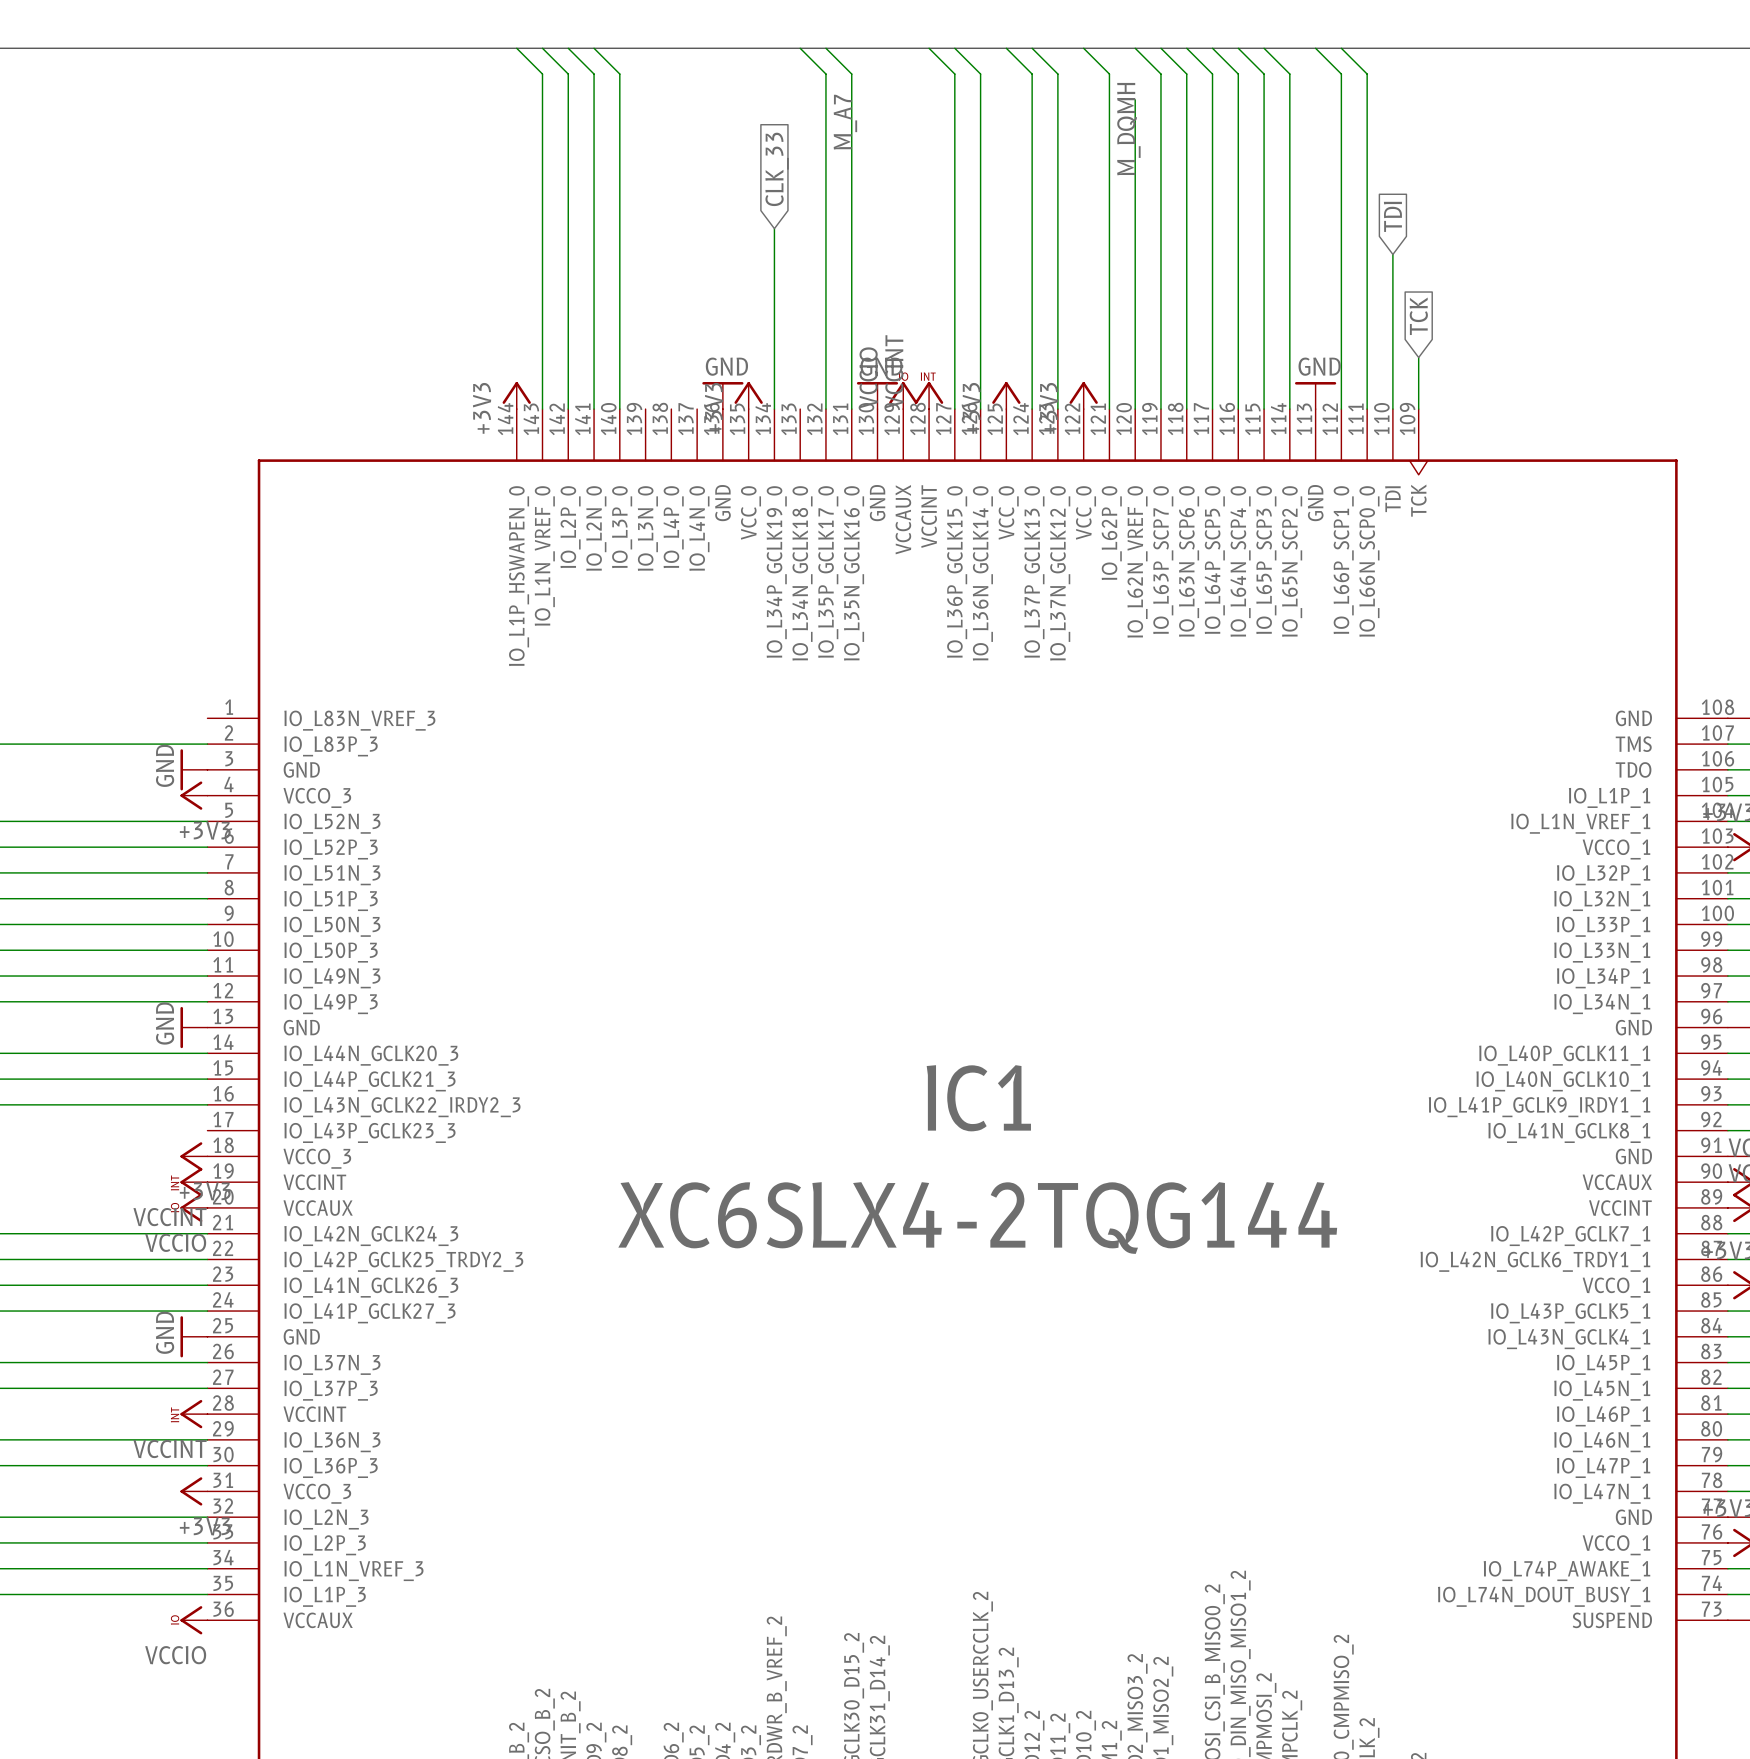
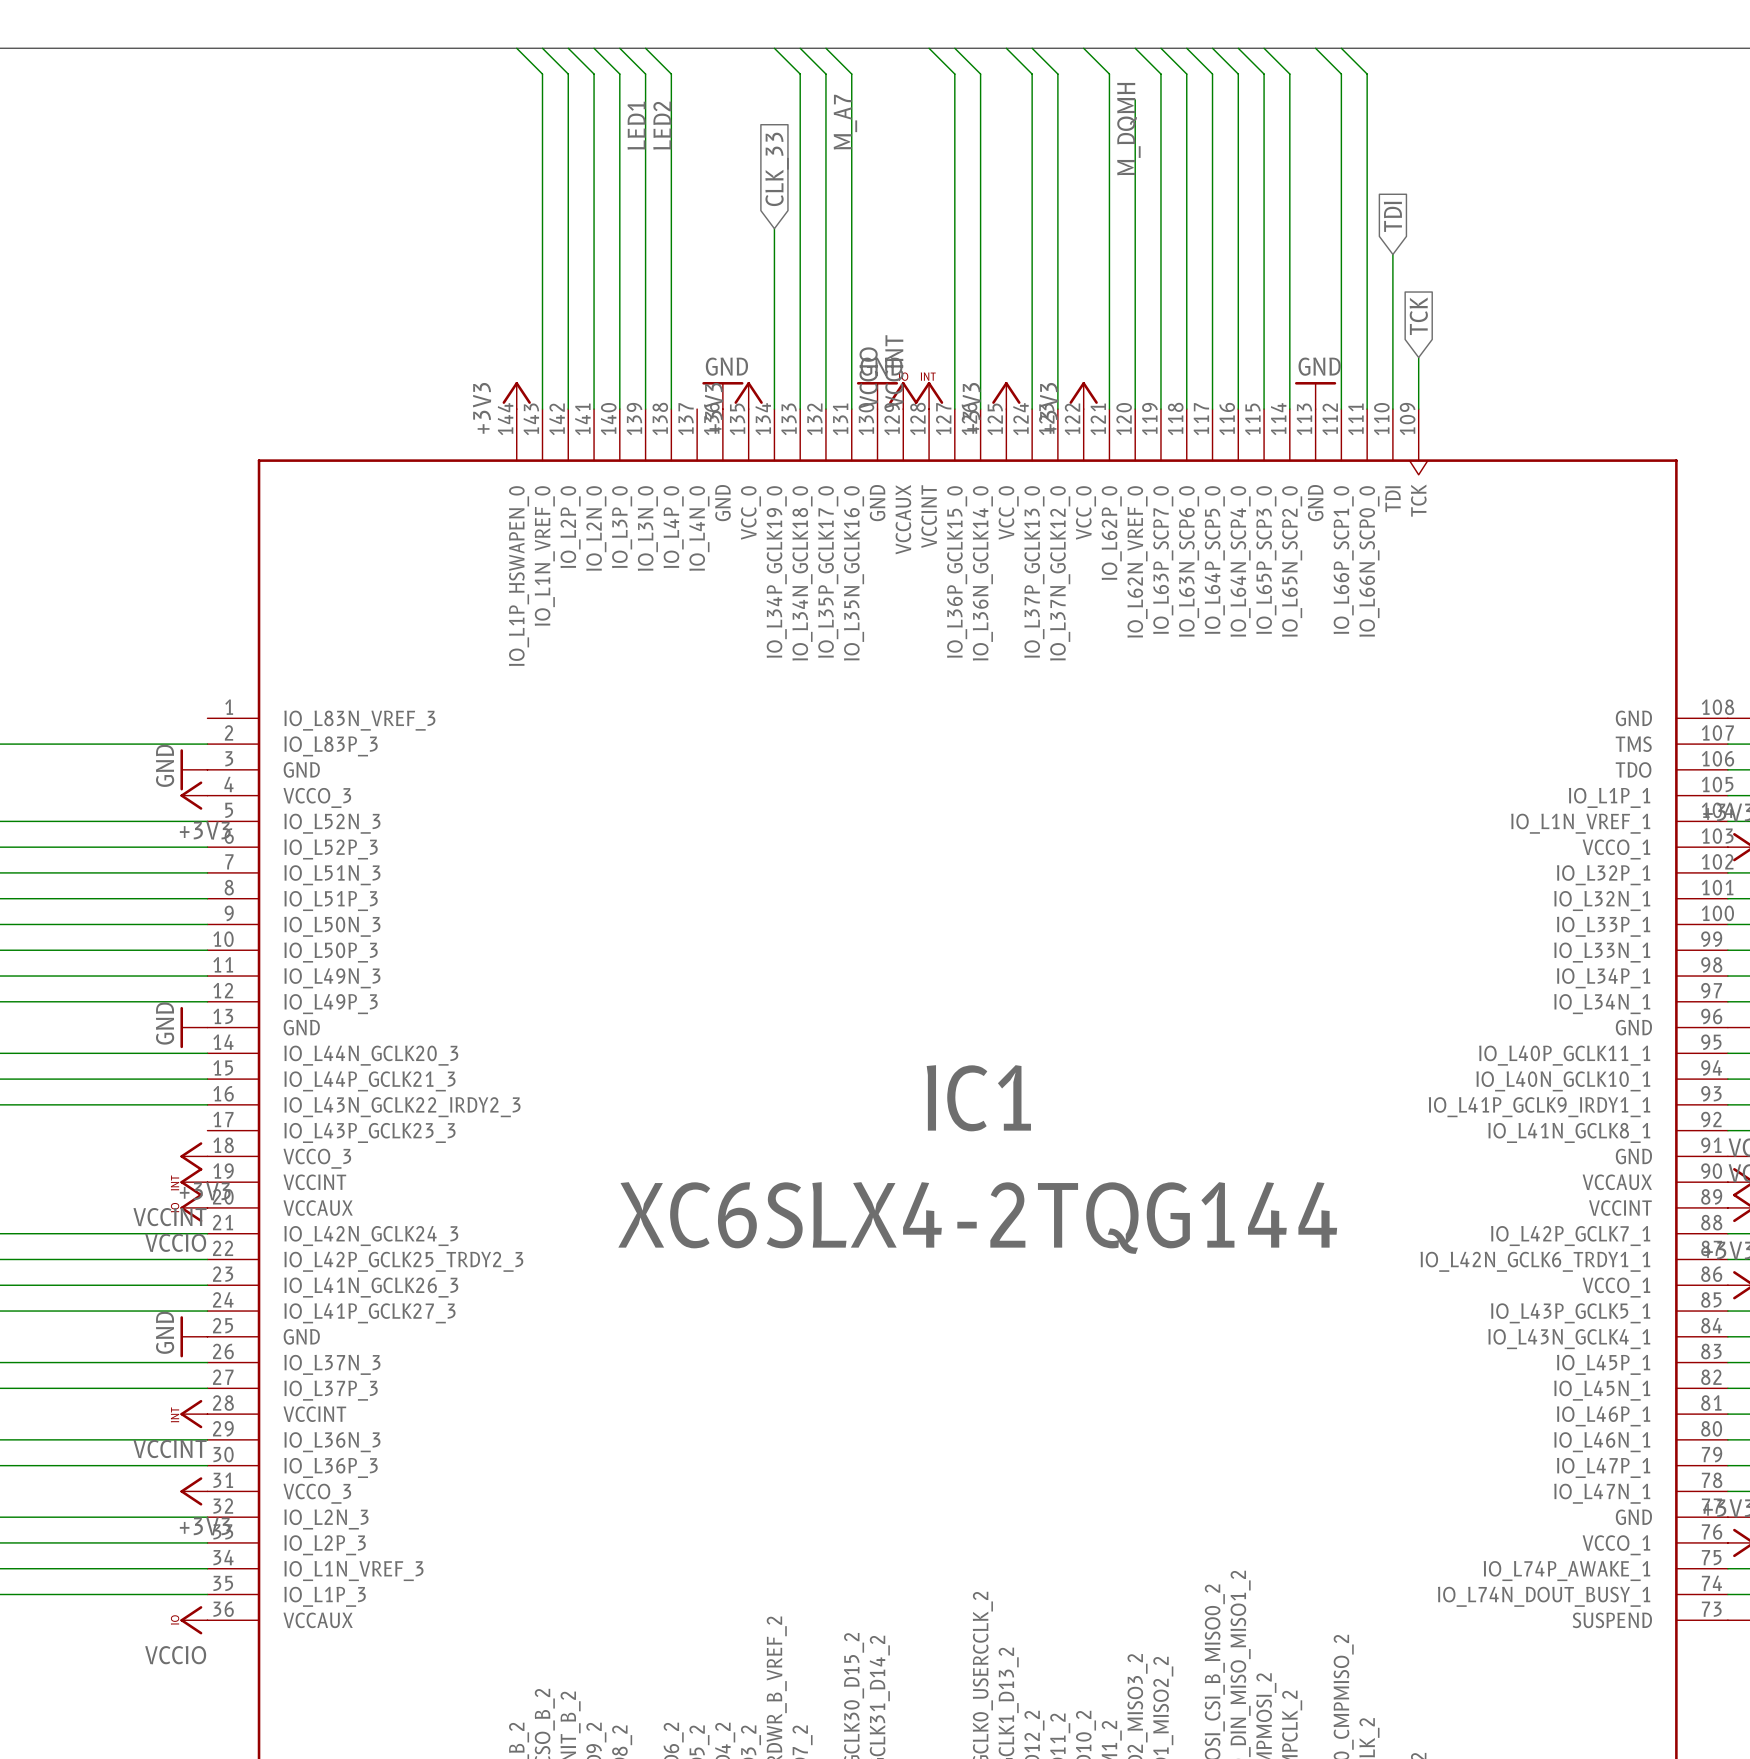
wire: none -> (619, 48) (645, 74) (645, 409)
wire: none -> (645, 48) (671, 74) (671, 409)
wire: none -> (774, 48) (800, 74) (800, 409)
label: none -> LED1 (636, 125)
label: none -> LED2 (662, 125)

